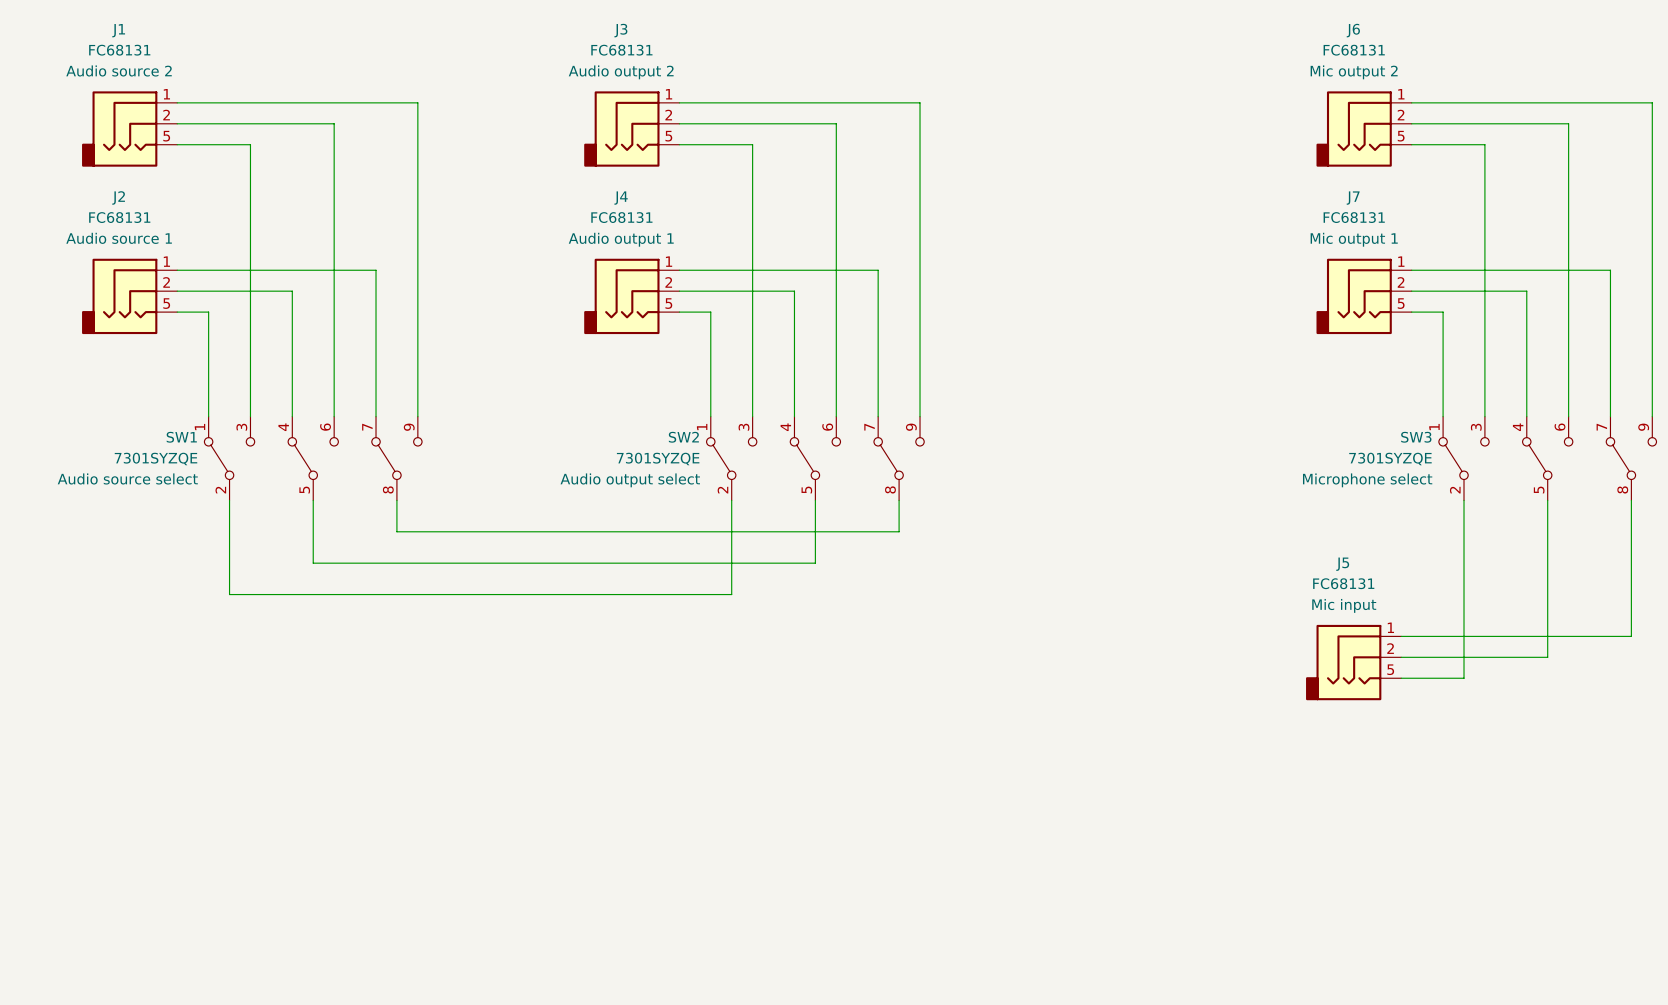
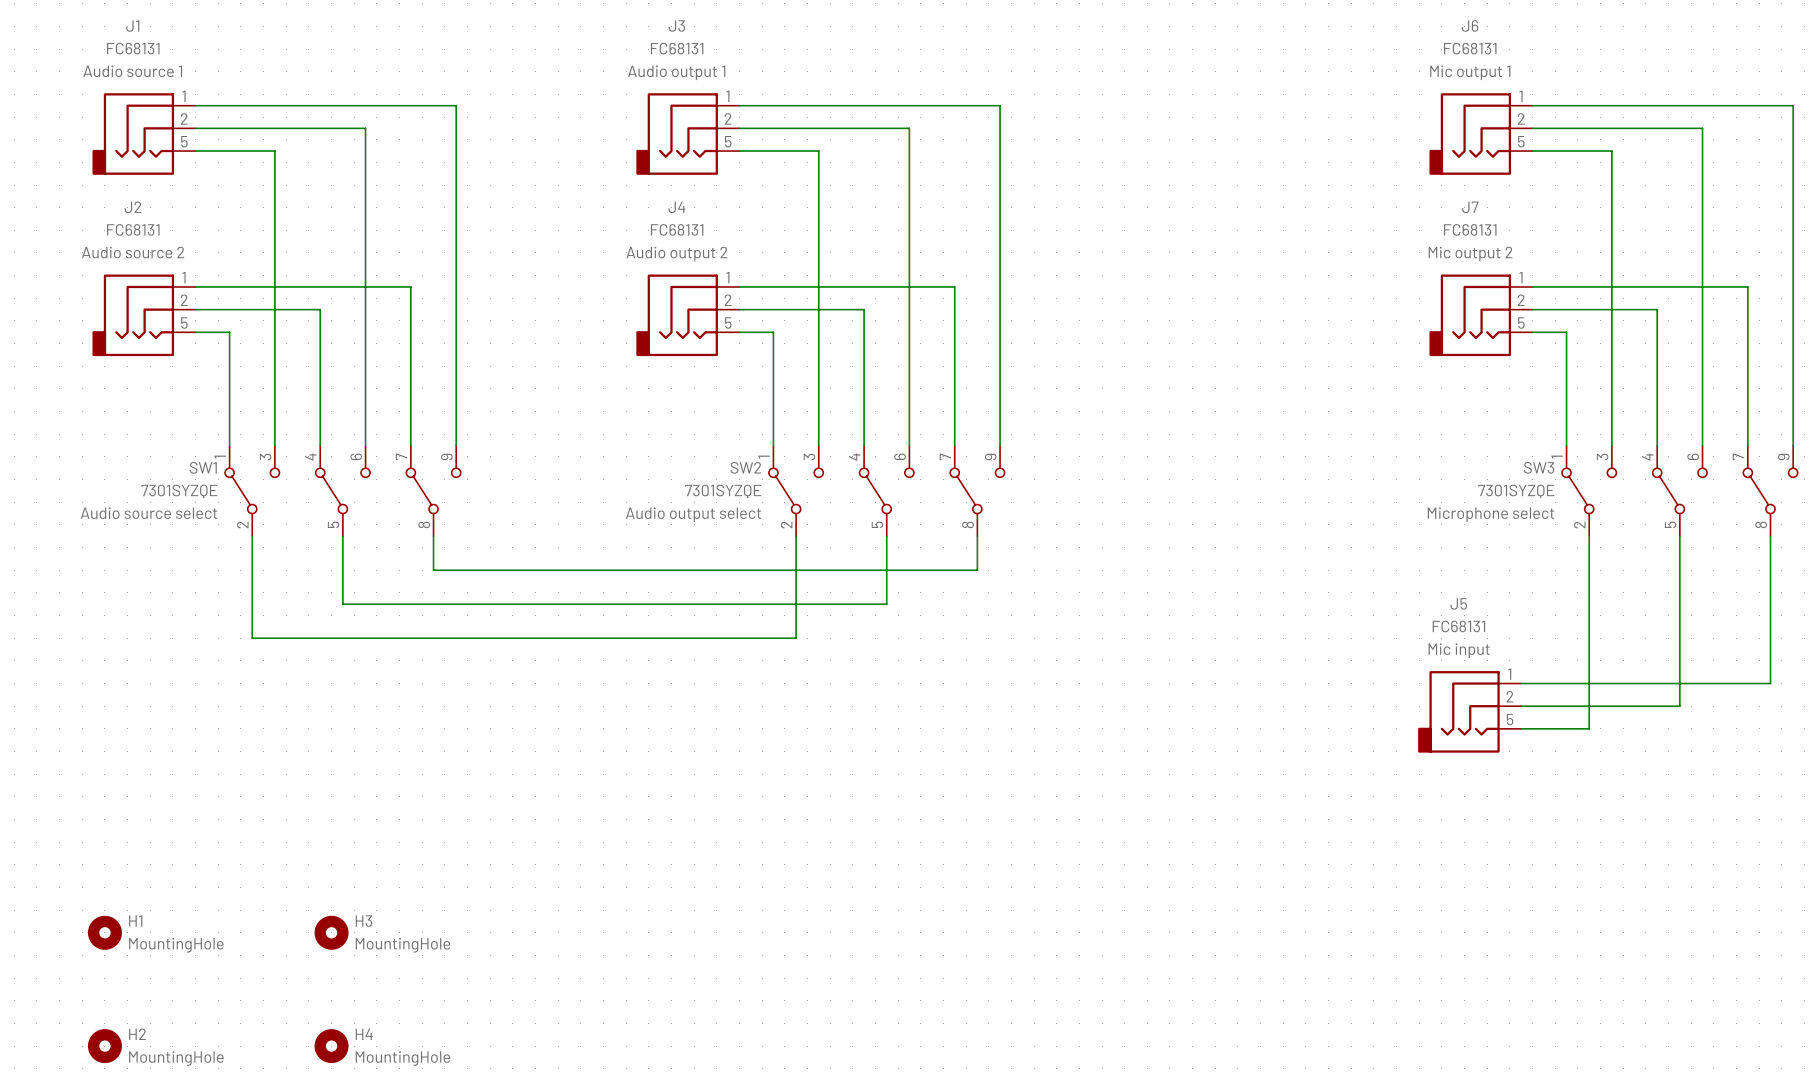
J1 text: Audio source 2 (119, 70) -> Audio source 1 (132, 71)
J3 text: Audio output 2 (621, 72) -> Audio output 1 (676, 72)
J6 text: Mic output 2 (1354, 72) -> Mic output 1 (1470, 72)
J2 text: Audio source 1 (119, 238) -> Audio source 2 (133, 252)
J4 text: Audio output 1 (621, 239) -> Audio output 2 (676, 254)
J7 text: Mic output 1 (1354, 239) -> Mic output 2 (1470, 254)
H1: none -> MountingHole (104, 932)
H3: none -> MountingHole (331, 932)
H2: none -> MountingHole (104, 1046)
H4: none -> MountingHole (331, 1046)

